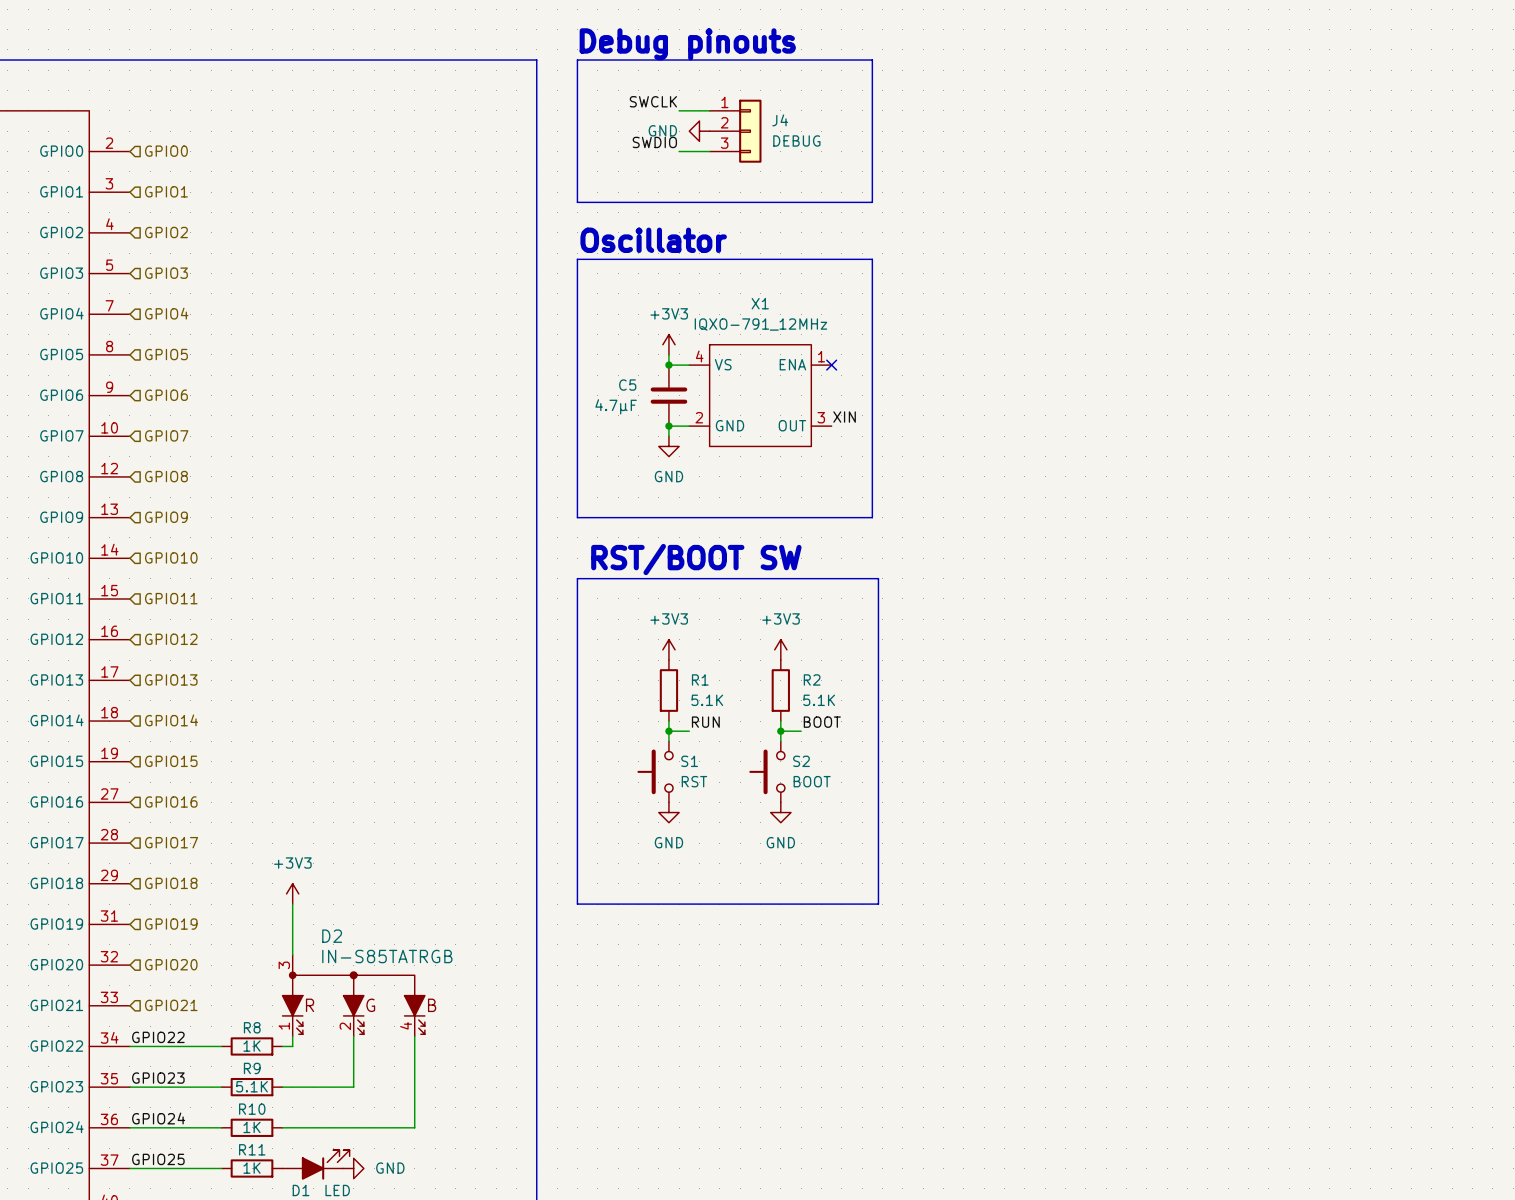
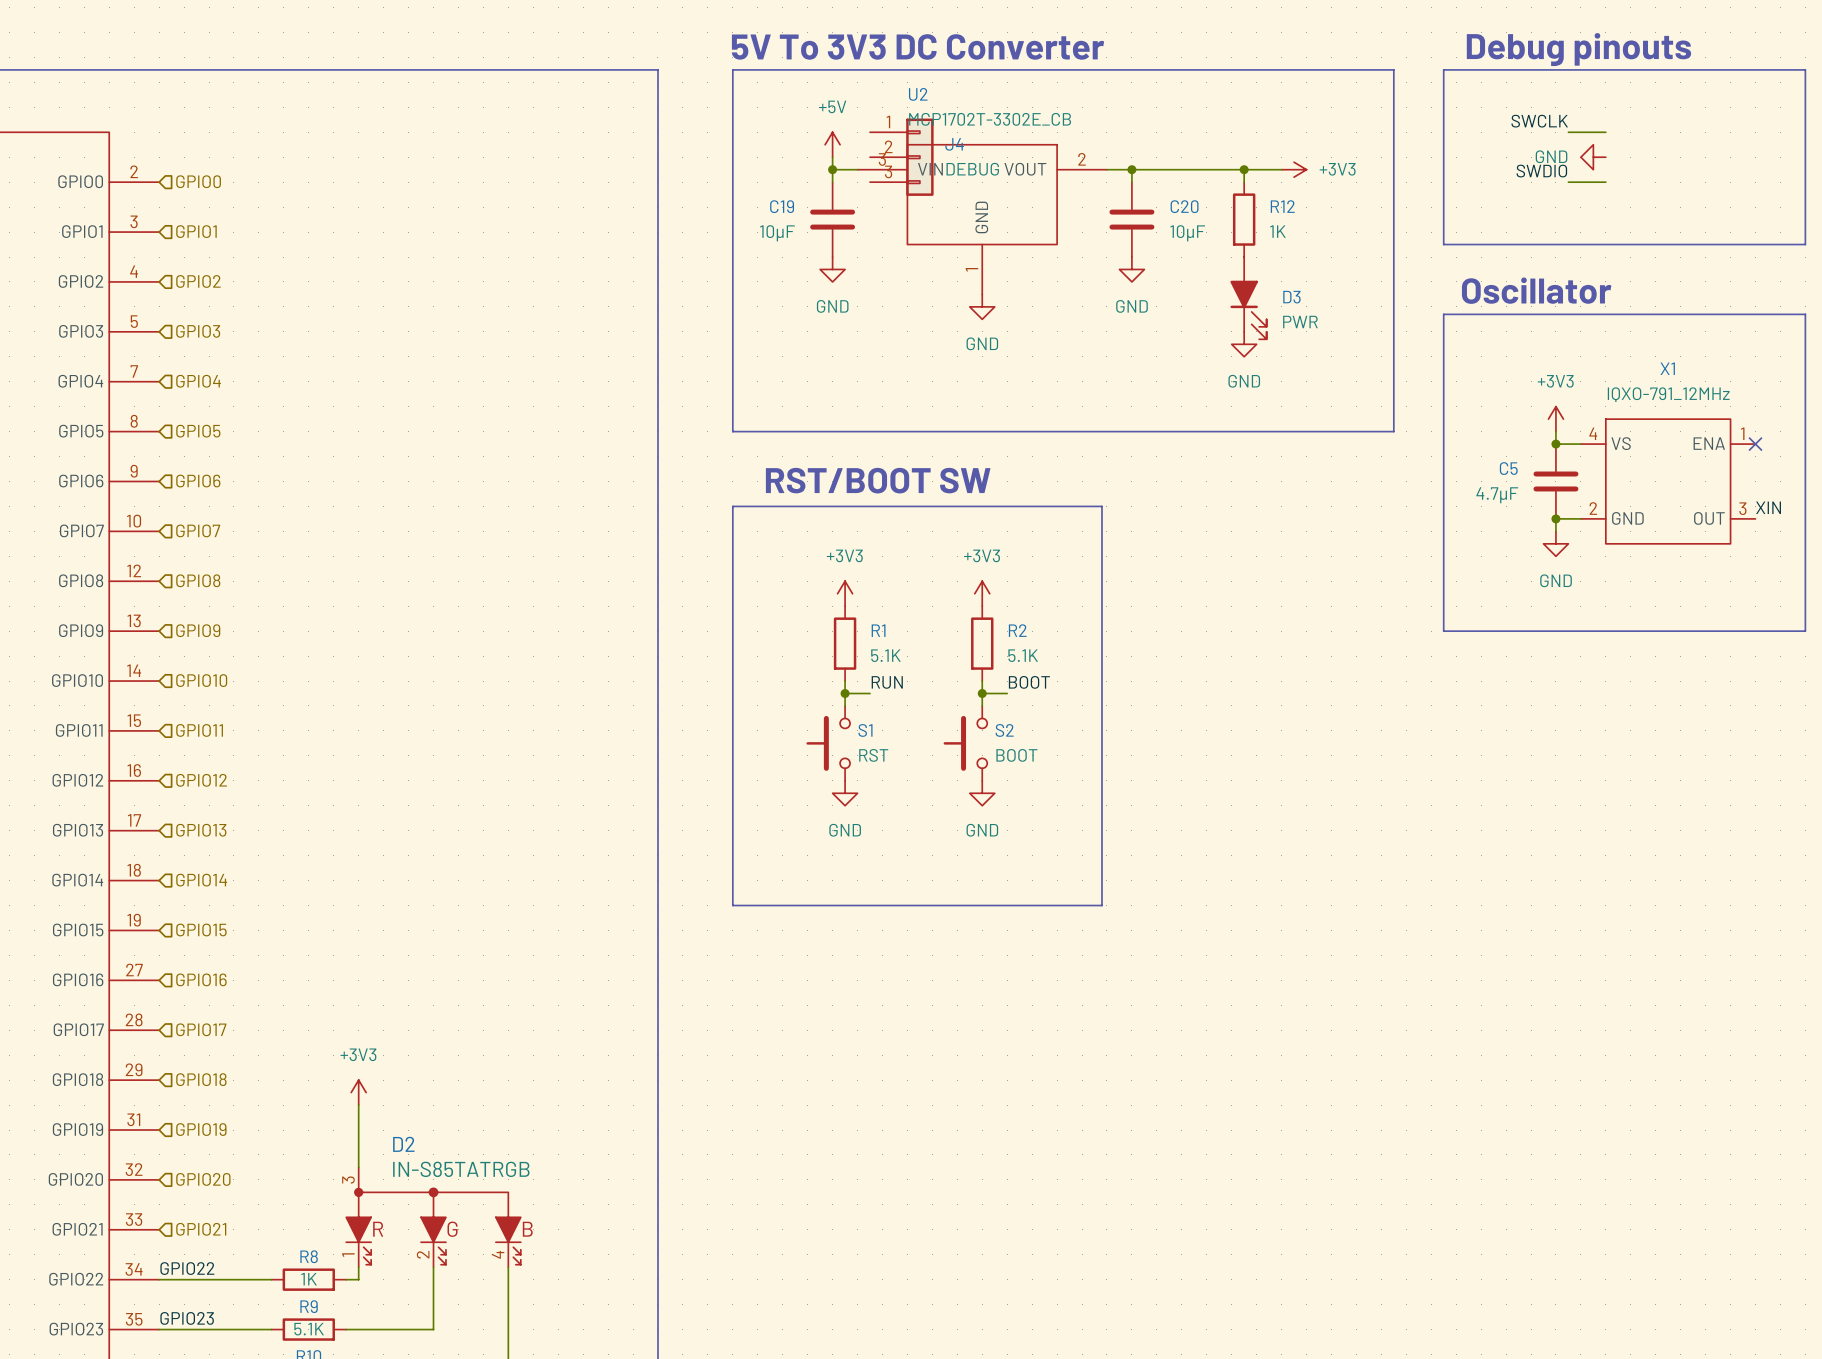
text: none -> 5V To 3V3 DC Converter (918, 46)
text: Debug pinouts (687, 44) -> none
text: none -> Debug pinouts (1578, 49)
line: (597, 60) (577, 60) (577, 202) (872, 202) (872, 60) -> (732, 69) (732, 431) (1393, 431) (1393, 69) (1069, 69)
line: none -> (1443, 69) (1805, 69) (1805, 244) (1443, 244) (1443, 69)
label: SWCLK (653, 101) -> none
label: none -> SWCLK (1539, 121)
wire: (679, 110) (709, 110) -> none
wire: none -> (1568, 132) (1605, 132)
power symbol: none -> +5V (832, 144)
power symbol: GND (699, 131) -> none
power symbol: none -> GND (1593, 157)
wire: none -> (832, 169) (857, 169)
junction: none -> (832, 169)
wire: none -> (1106, 169) (1281, 169)
wire: none -> (1131, 169) (1131, 182)
junction: none -> (1131, 169)
wire: none -> (1244, 169) (1244, 182)
junction: none -> (1244, 169)
power symbol: none -> +3V3 (1294, 169)
label: SWDIO (654, 142) -> none
label: none -> SWDIO (1541, 171)
wire: (679, 151) (709, 151) -> (832, 182) (832, 157)
wire: none -> (1568, 182) (1605, 182)
C19: none -> 10µF (832, 219)
U2: none -> MCP1702T-3302E_CB (982, 219)
C20: none -> 10µF (1131, 219)
R12: none -> 1K (1244, 219)
power symbol: none -> GND (832, 269)
power symbol: none -> GND (1131, 269)
text: Oscillator (653, 240) -> none
text: none -> Oscillator (1536, 290)
D3: none -> PWR (1248, 298)
power symbol: none -> GND (982, 306)
line: (577, 259) (872, 259) (872, 517) (577, 517) (577, 259) -> none
line: none -> (1443, 314) (1805, 314) (1805, 631) (1443, 631) (1443, 314)
power symbol: none -> GND (1244, 344)
power symbol: +3V3 (668, 344) -> none
power symbol: none -> +3V3 (1555, 419)
wire: (668, 354) (668, 365) (689, 365) -> none
wire: none -> (1555, 431) (1555, 444) (1580, 444)
junction: (668, 365) -> none
no-connect mark: (831, 365) -> none
junction: none -> (1555, 444)
no-connect mark: none -> (1755, 444)
C5 position: (668, 395) -> (1555, 481)
X1 position: (760, 395) -> (1668, 481)
label: XIN (844, 417) -> none
label: none -> XIN (1768, 507)
junction: (668, 426) -> none
wire: (689, 426) (668, 426) (668, 436) -> none
junction: none -> (1555, 518)
wire: none -> (1580, 518) (1555, 518) (1555, 531)
power symbol: GND (668, 446) -> none
power symbol: none -> GND (1555, 543)
power symbol: none -> +3V3 (845, 593)
power symbol: none -> +3V3 (982, 593)
text position: RST/BOOT SW (696, 559) -> RST/BOOT SW (878, 480)
junction: none -> (845, 693)
junction: none -> (982, 693)
line: (577, 578) (577, 904) (878, 904) (878, 578) (577, 578) -> (732, 506) (732, 905) (1101, 905) (1101, 506) (732, 506)
power symbol: +3V3 (668, 649) -> none
power symbol: none -> GND (845, 793)
power symbol: +3V3 (780, 649) -> none
power symbol: none -> GND (982, 793)
R1 position: (668, 690) -> (845, 643)
R2 position: (780, 690) -> (982, 643)
wire: (668, 721) (668, 741) -> (845, 681) (845, 705)
wire: (780, 721) (780, 741) -> (982, 681) (982, 705)
label position: RUN (705, 722) -> RUN (887, 682)
label position: BOOT (822, 722) -> BOOT (1029, 682)
wire: (668, 731) (689, 731) -> (845, 693) (870, 693)
junction: (668, 731) -> none
wire: (780, 731) (801, 731) -> (982, 693) (1007, 693)
junction: (780, 731) -> none
S1 position: (655, 771) -> (828, 743)
S2 position: (767, 771) -> (965, 743)
power symbol: GND (668, 812) -> none
power symbol: GND (780, 812) -> none

